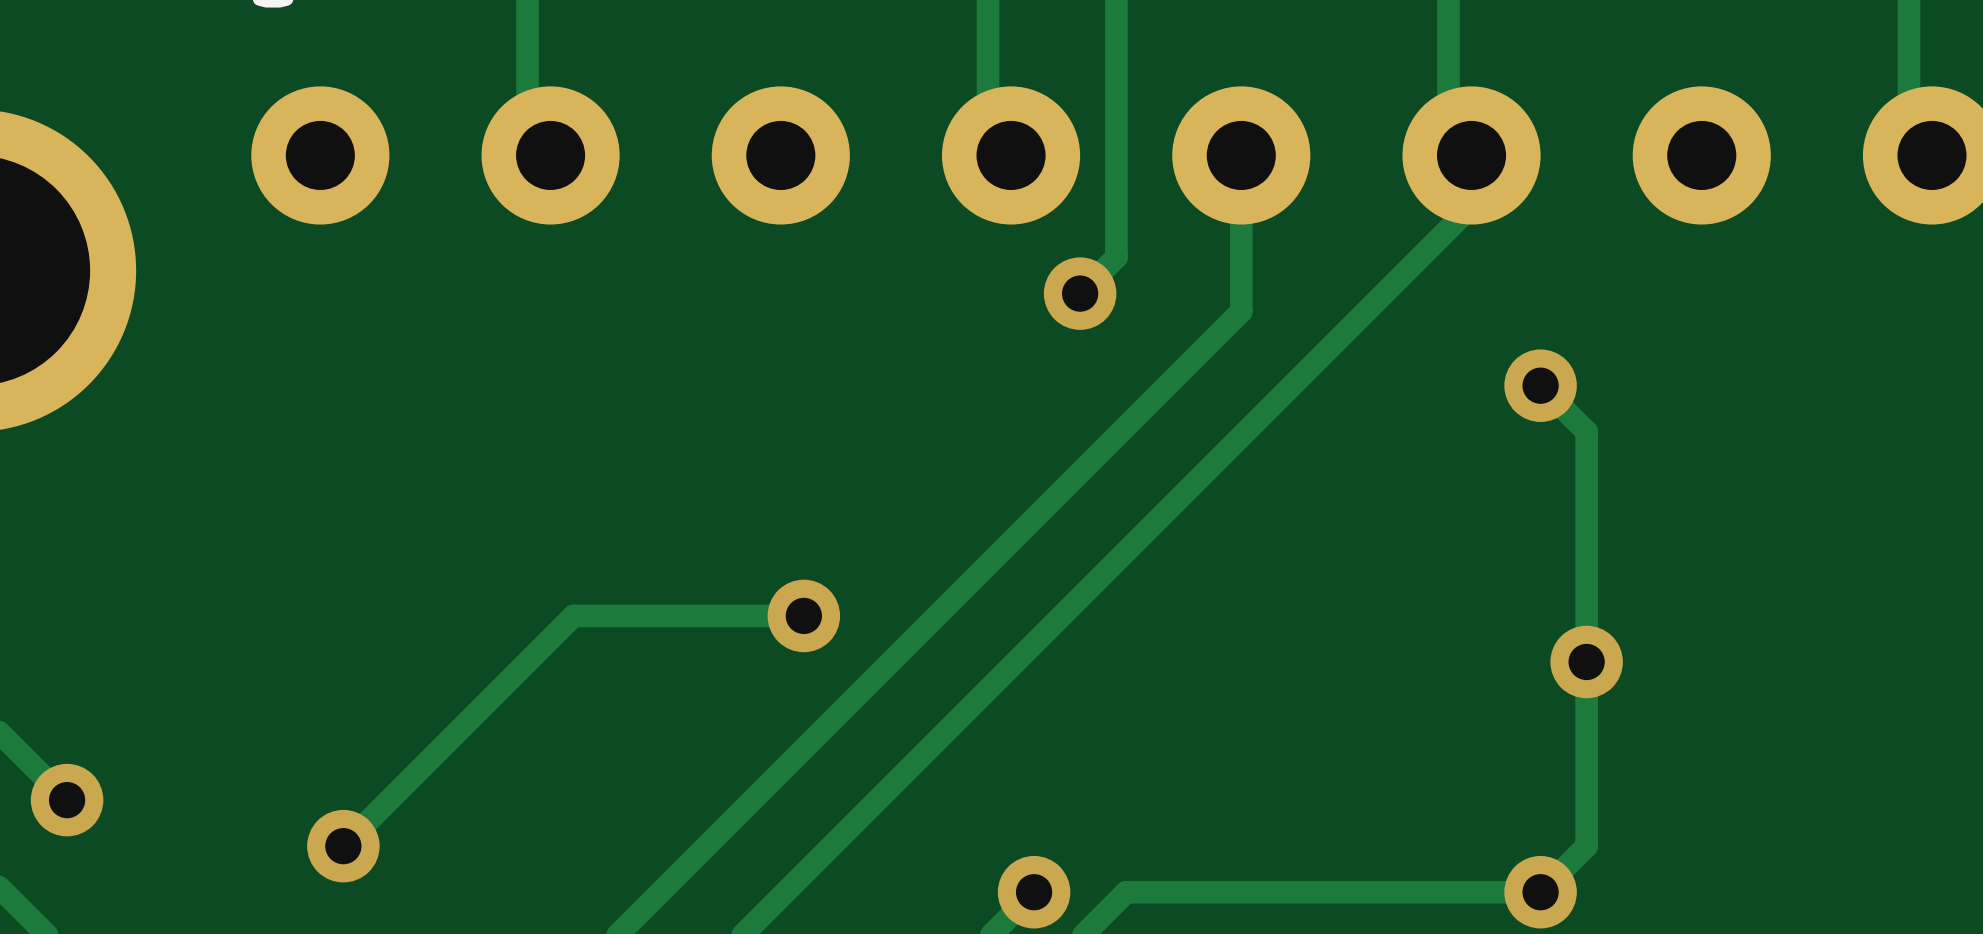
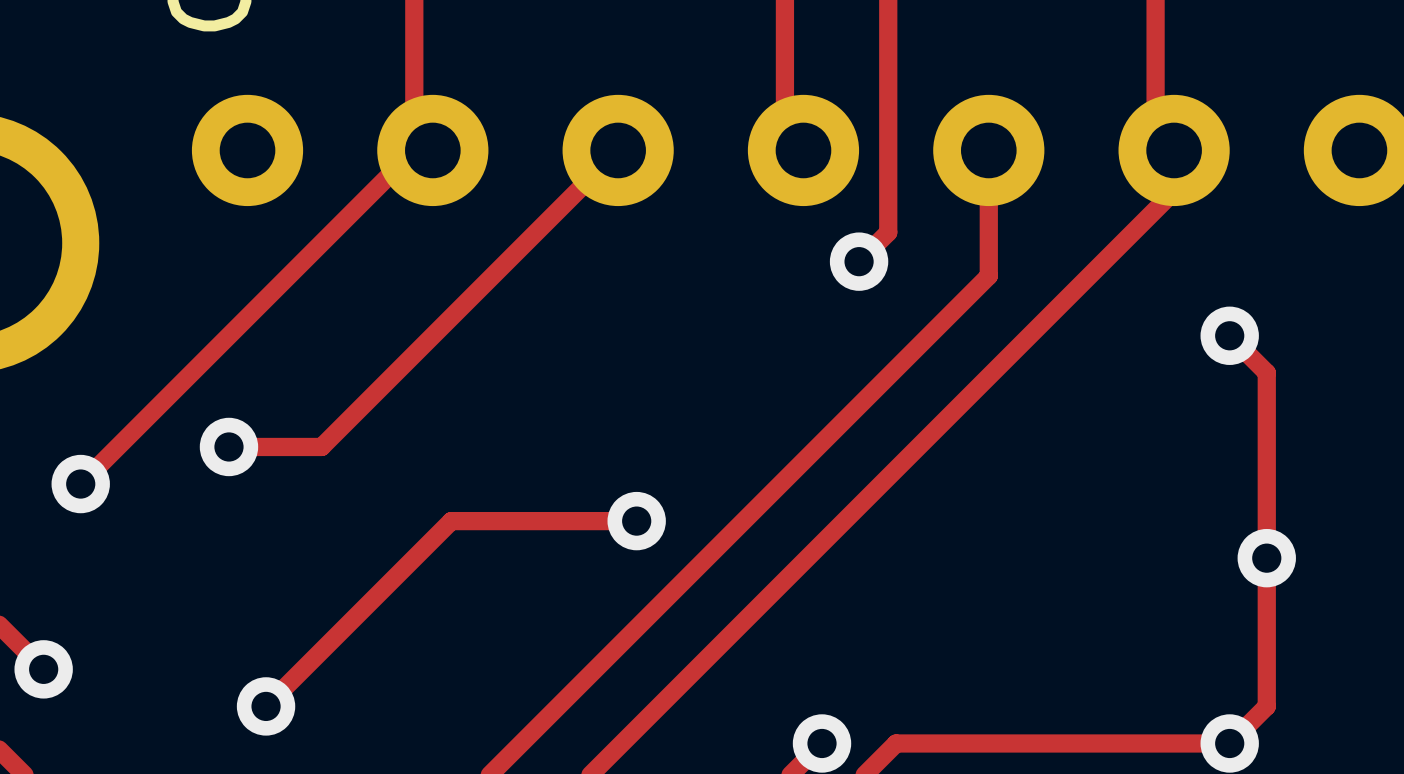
track: none -> (414, 150) (80, 484)
track: none -> (618, 150) (321, 446) (228, 446)
via: none -> (228, 446)
via: none -> (80, 484)

